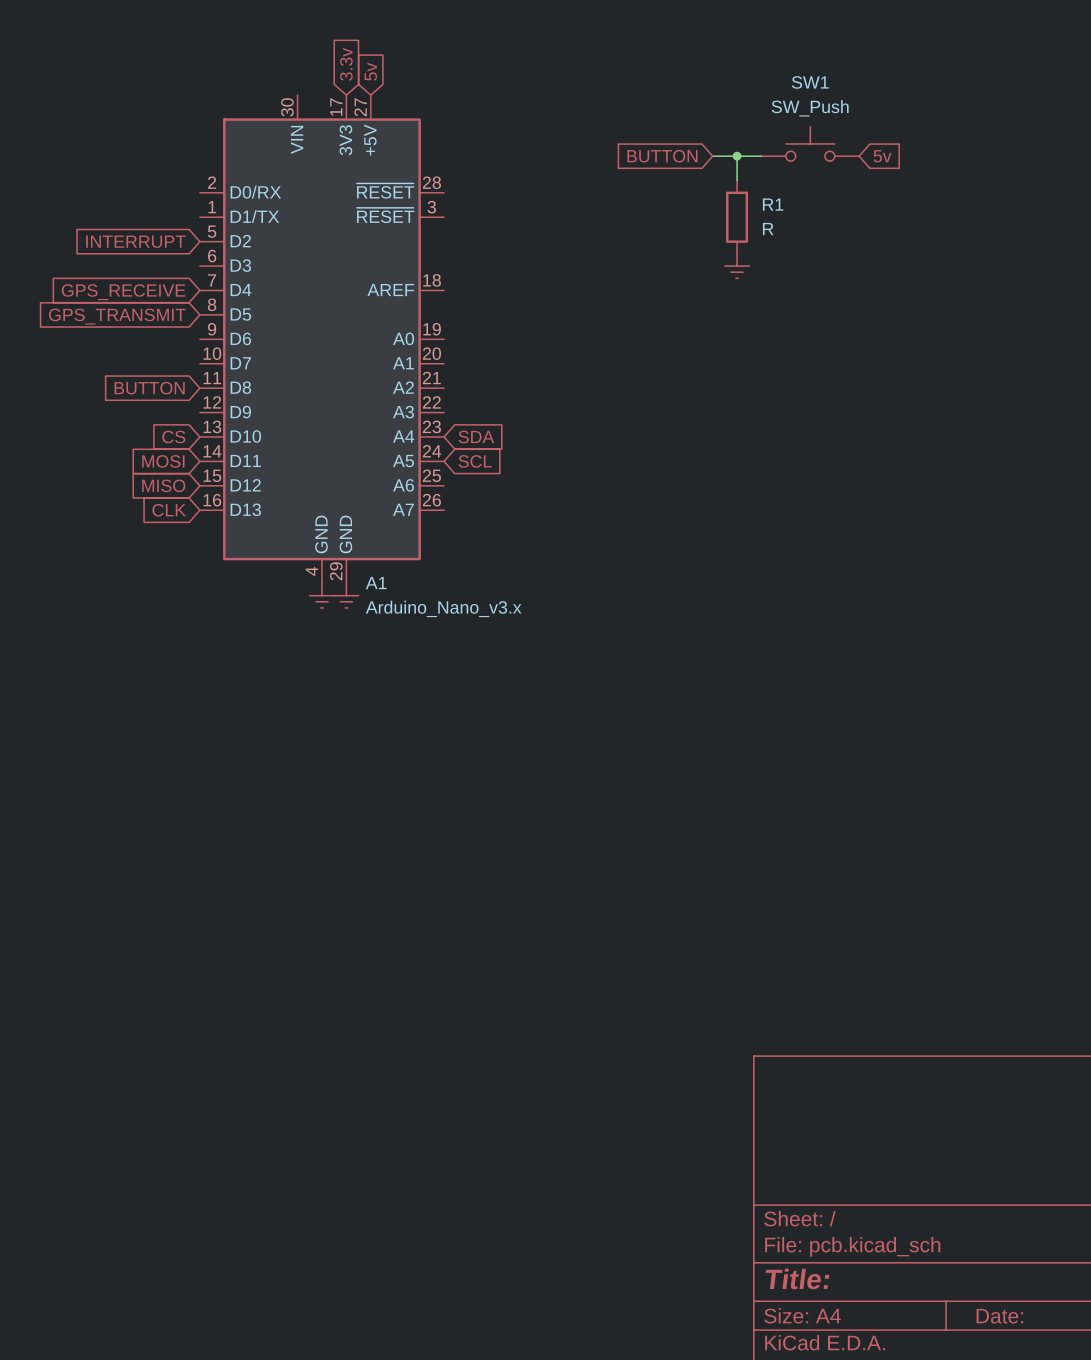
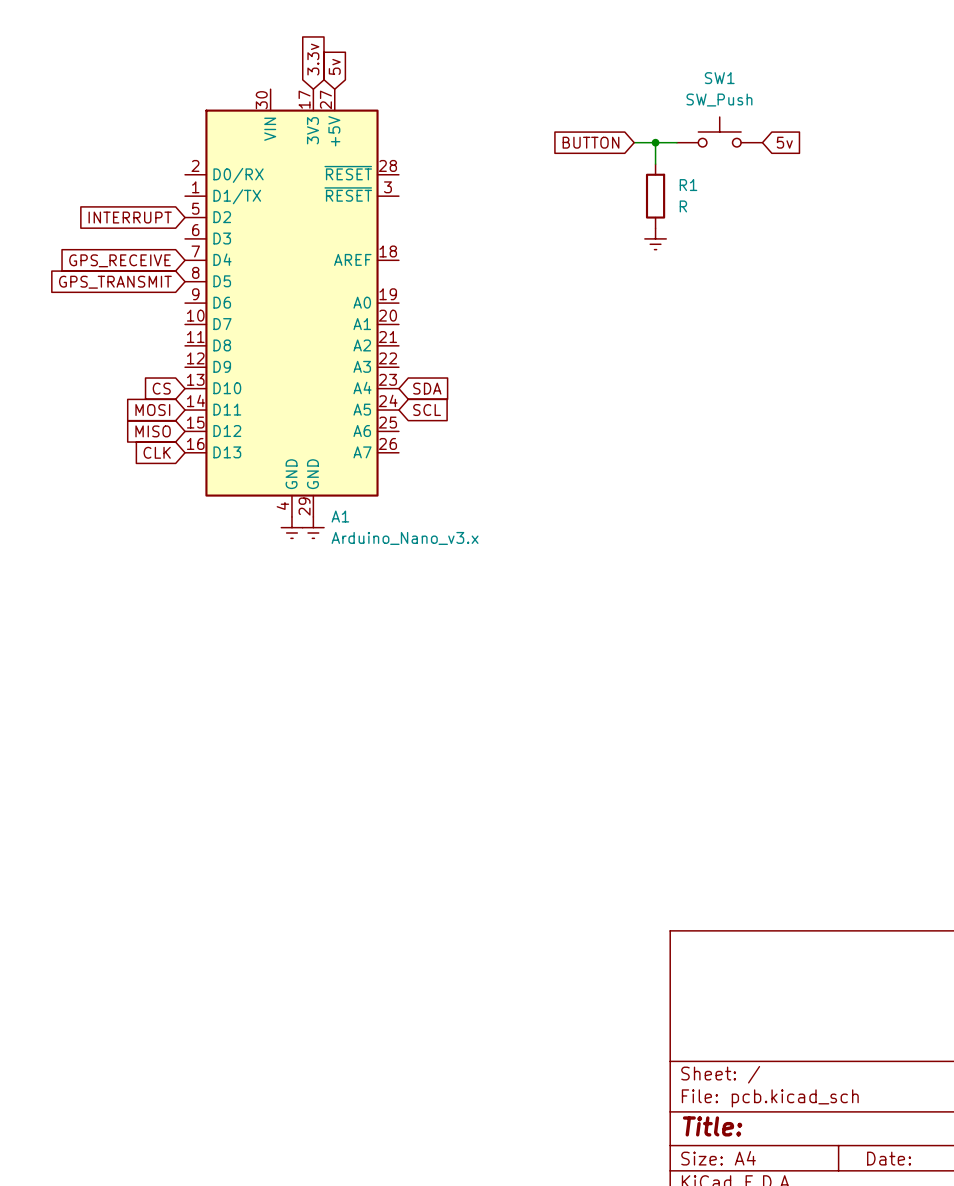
global label: BUTTON (149, 388) -> none

